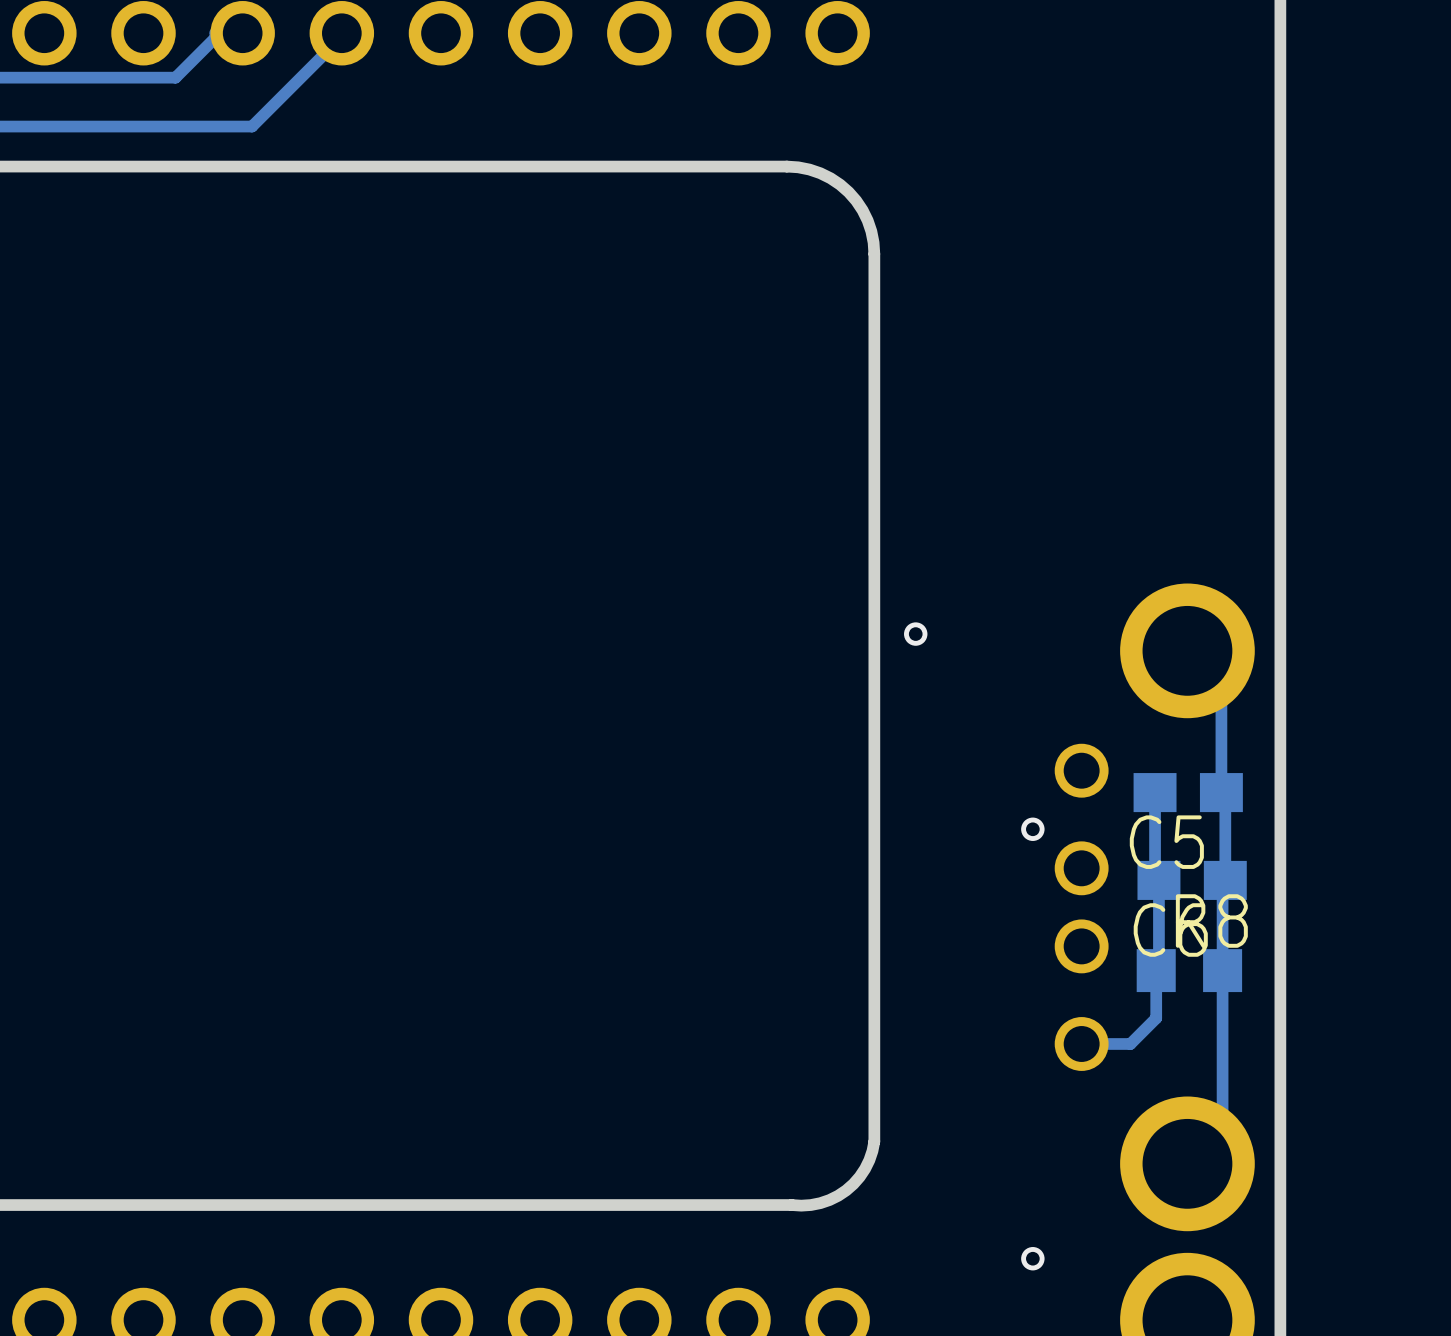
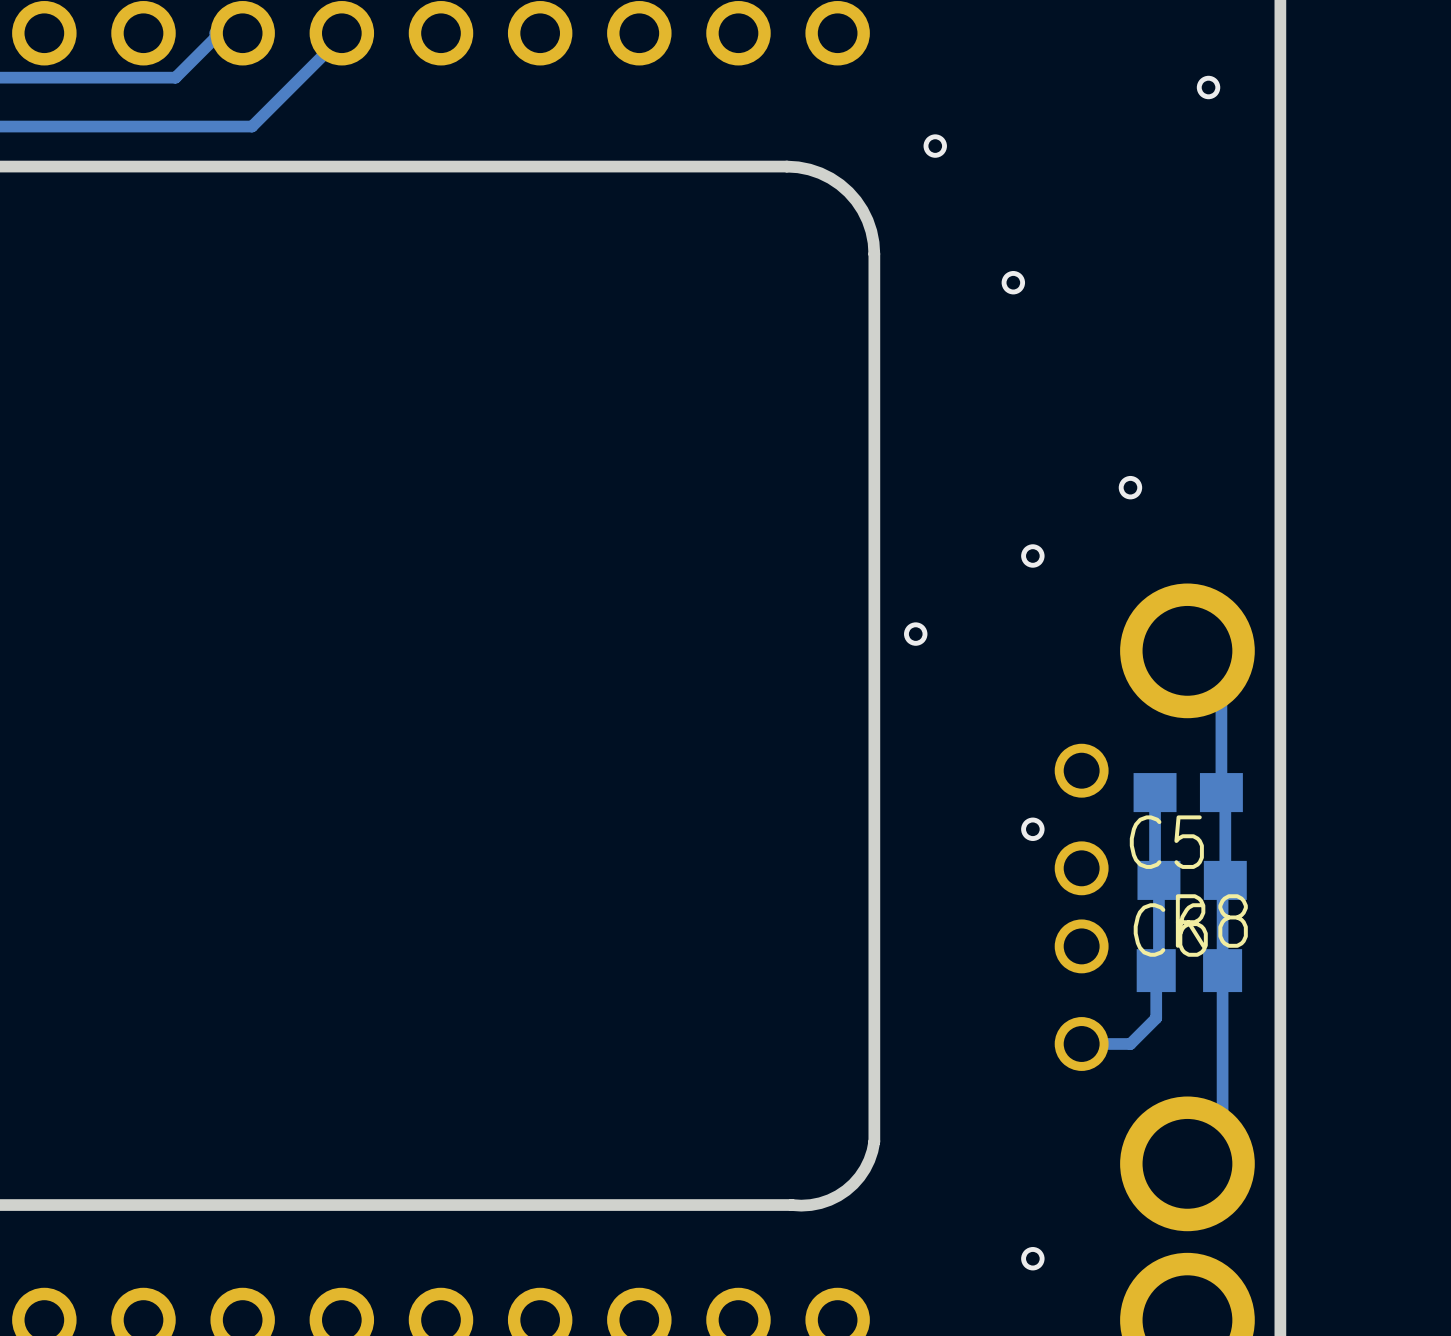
via: none -> (1208, 87)
via: none -> (935, 146)
via: none -> (1013, 282)
via: none -> (1130, 487)
via: none -> (1032, 555)

